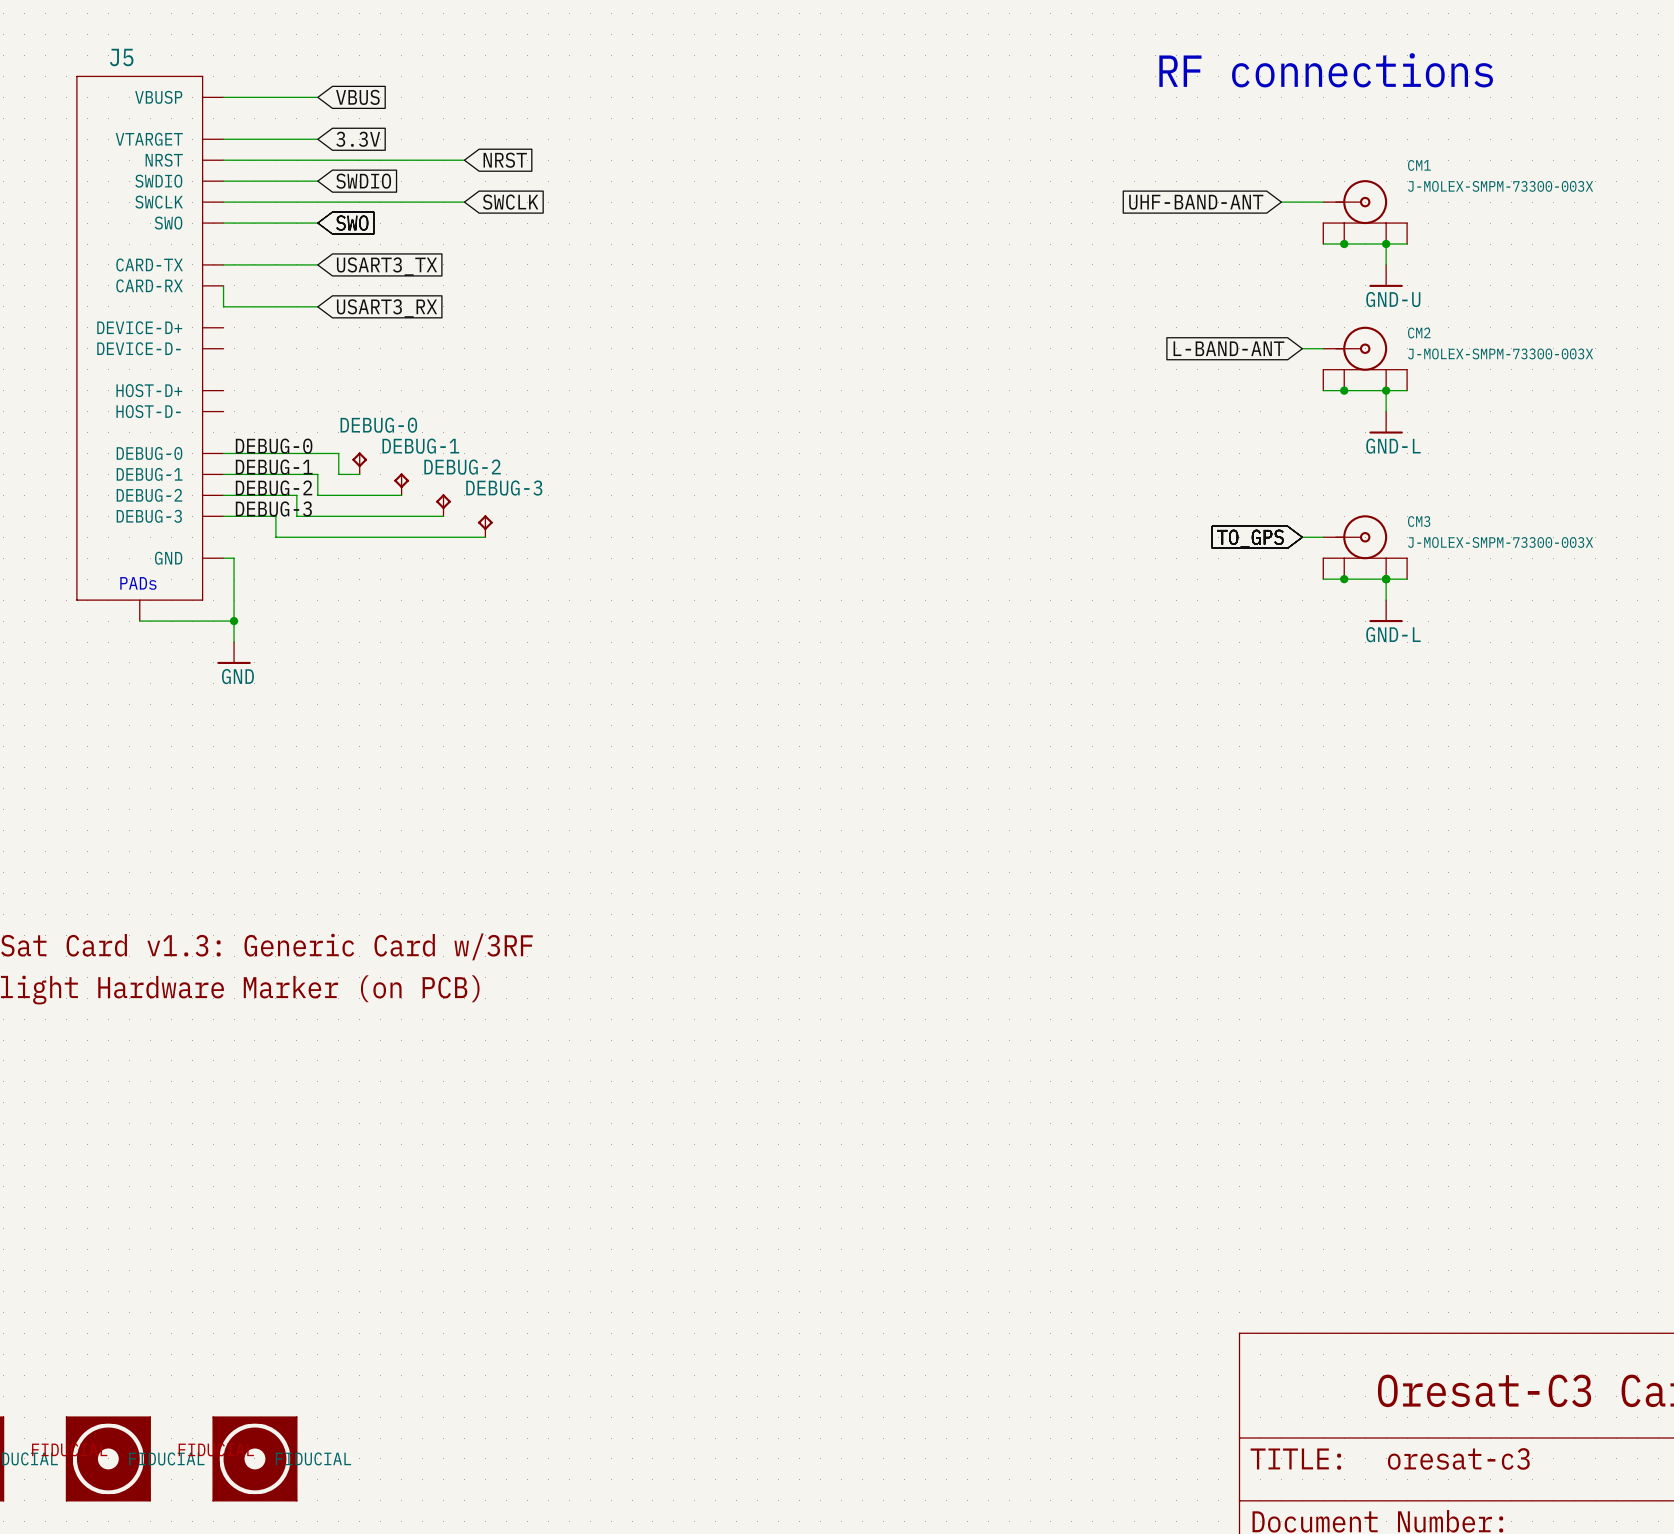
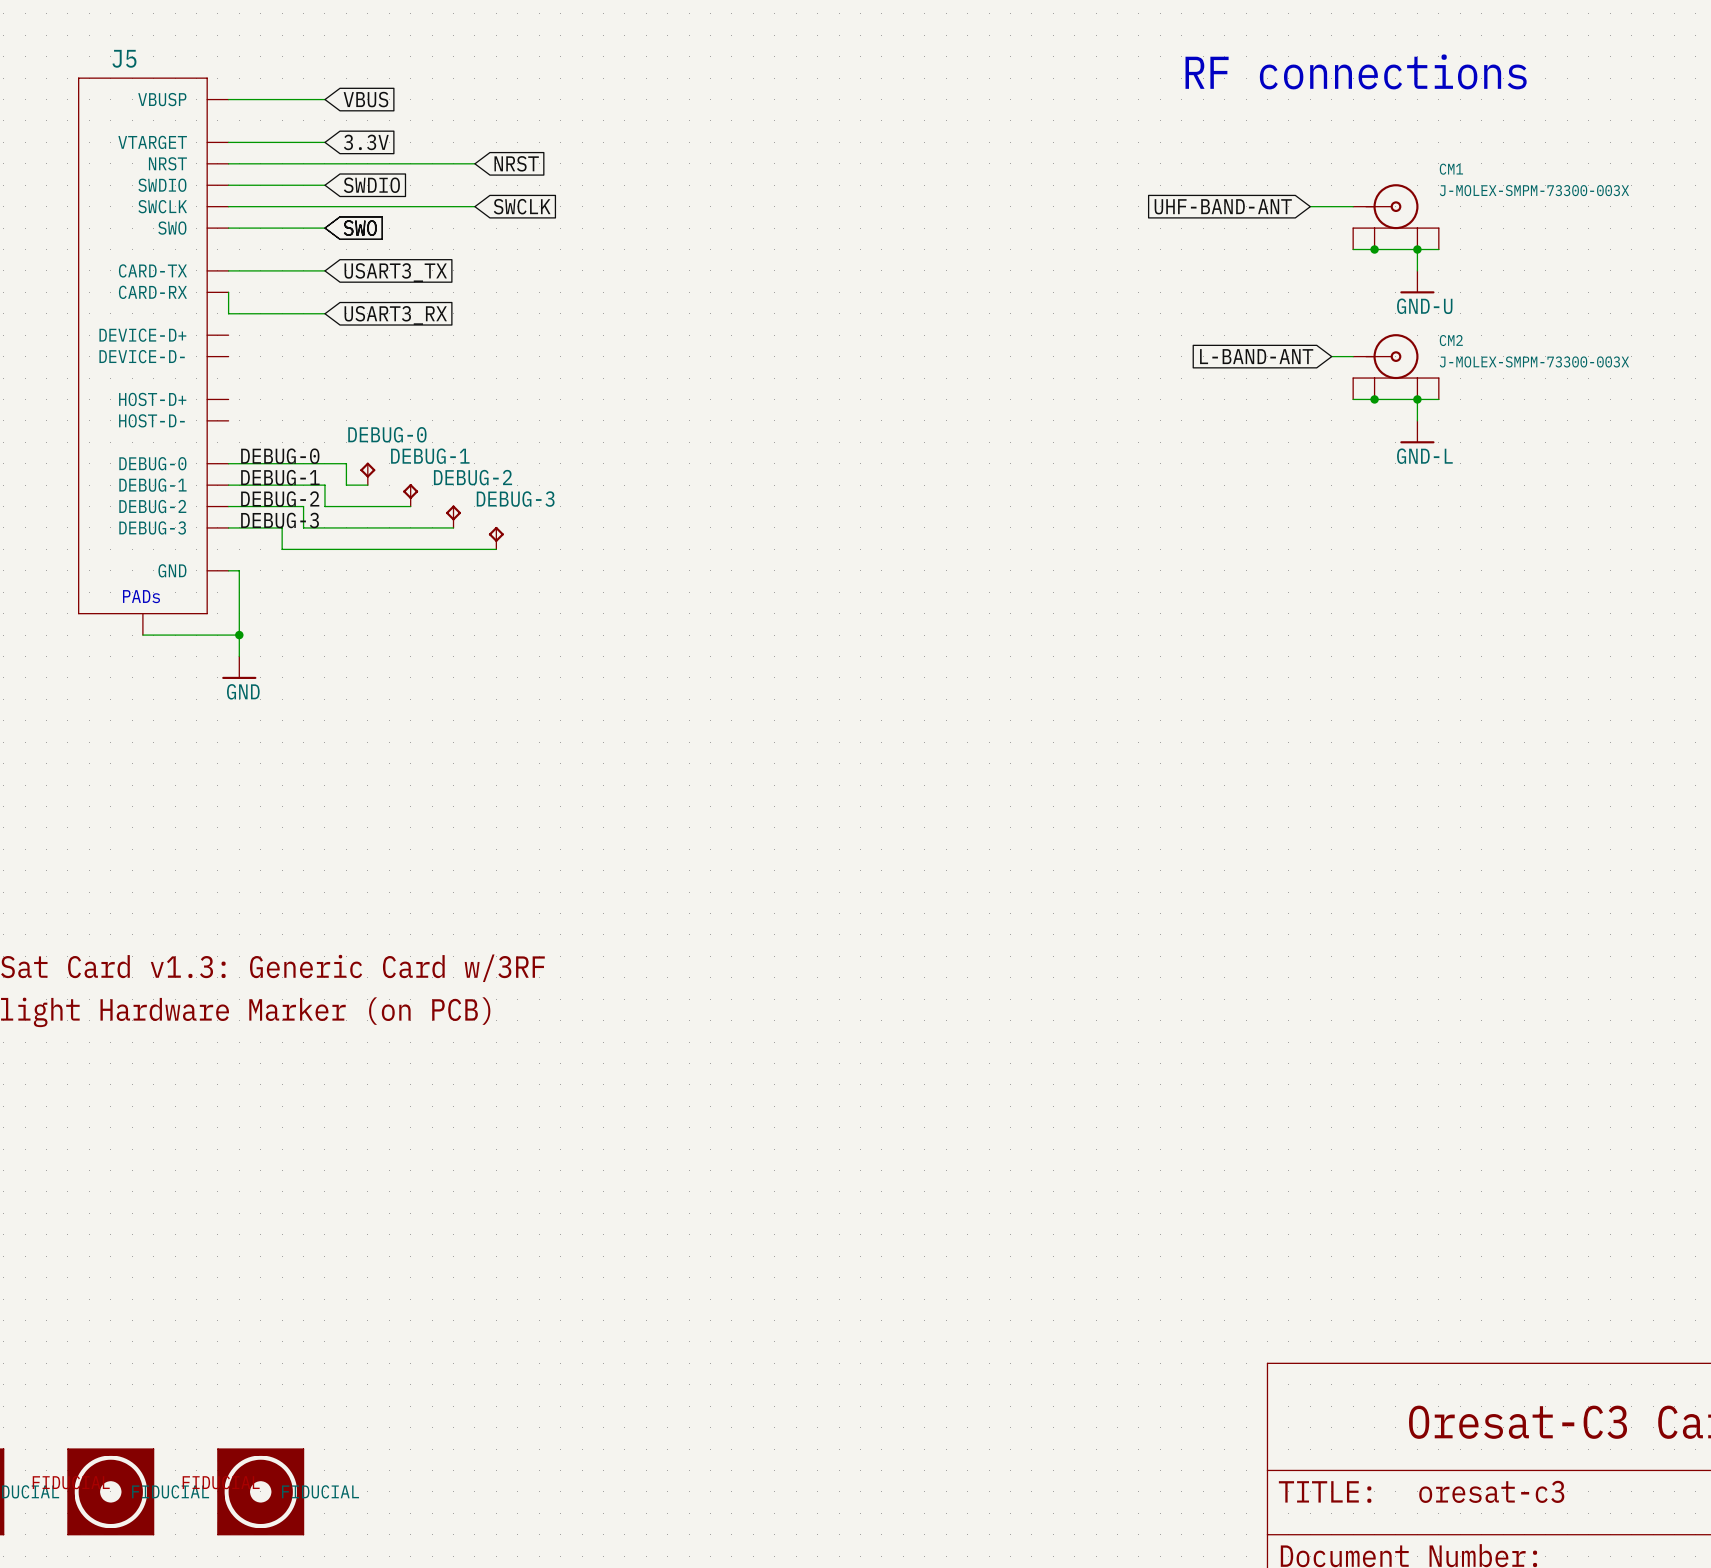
wire: (1302, 537) (1323, 537) -> none
global label: TO_GPS (1250, 538) -> none
CM3: J-MOLEX-SMPM-73300-003X (1365, 547) -> none
wire: (1323, 579) (1407, 579) -> none
junction: (1344, 579) -> none
wire: (1386, 579) (1386, 600) -> none
junction: (1386, 579) -> none
power symbol: GND-L (1386, 611) -> none

